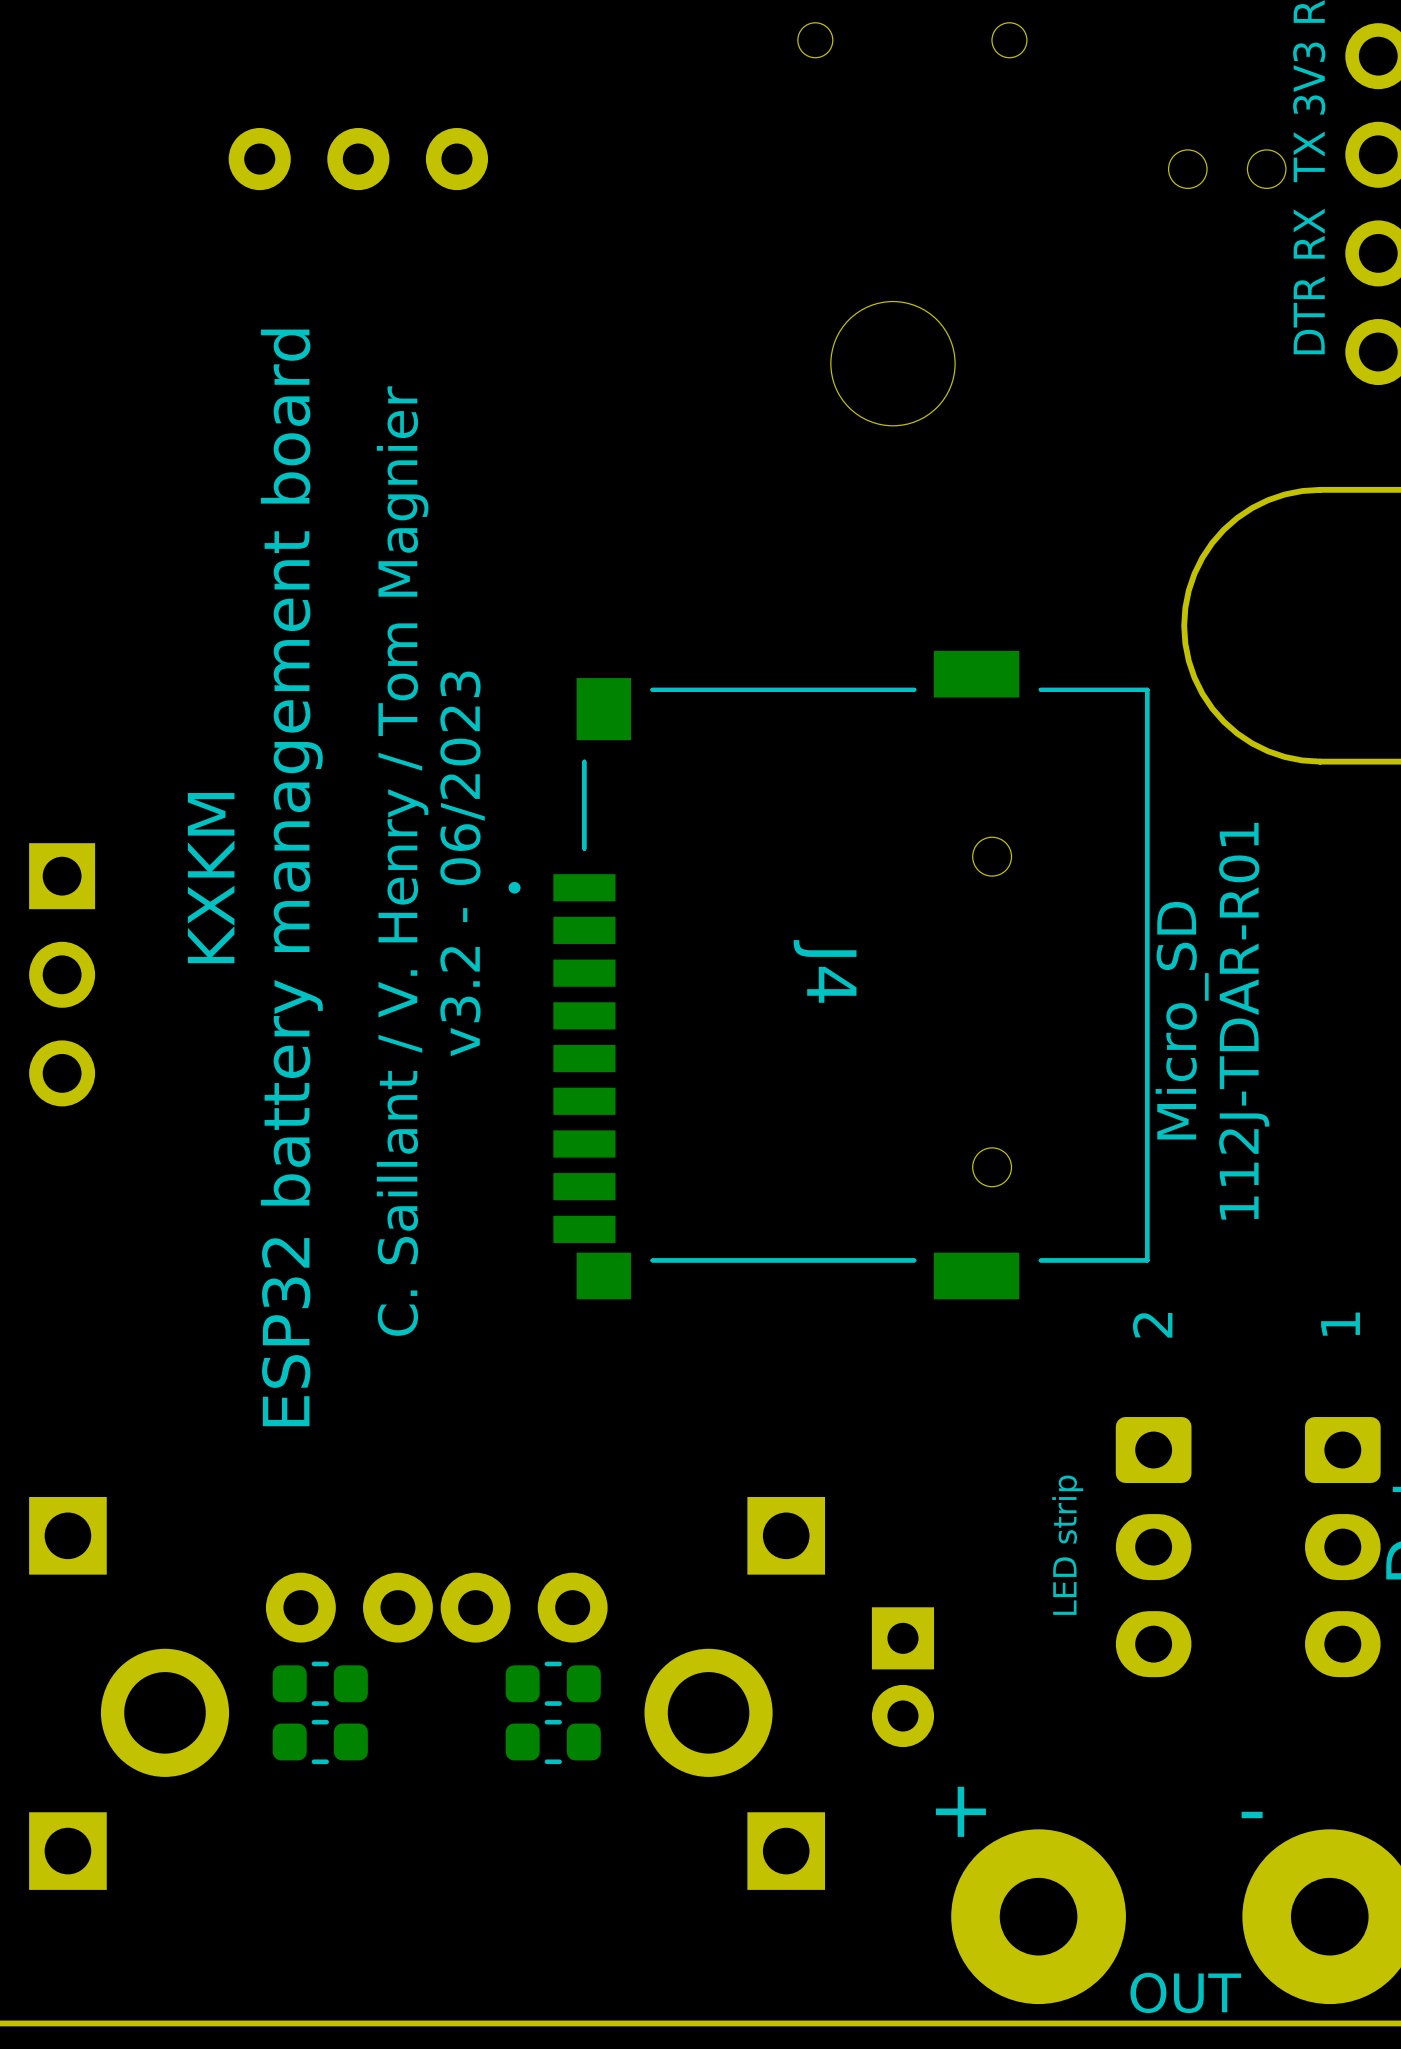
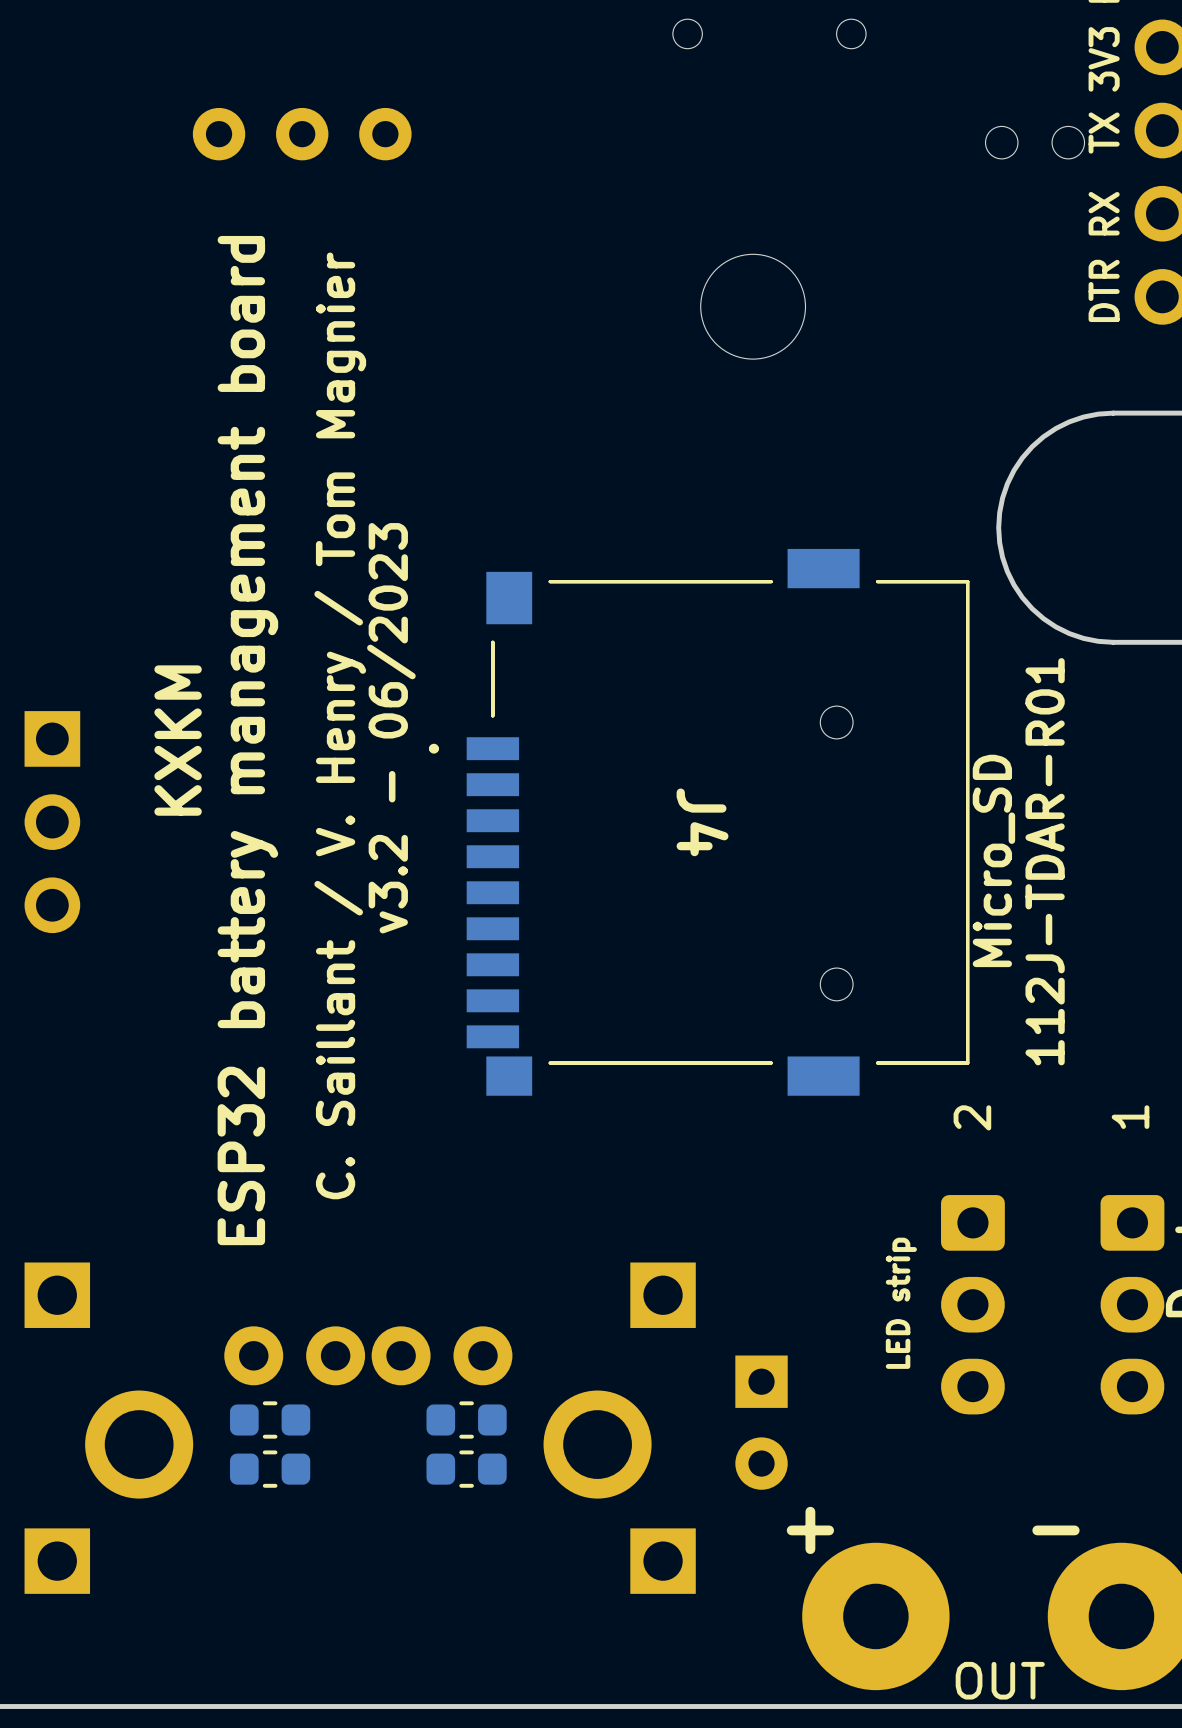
part footprint: [871, 1607, 935, 1748] -> [735, 1355, 788, 1490]

